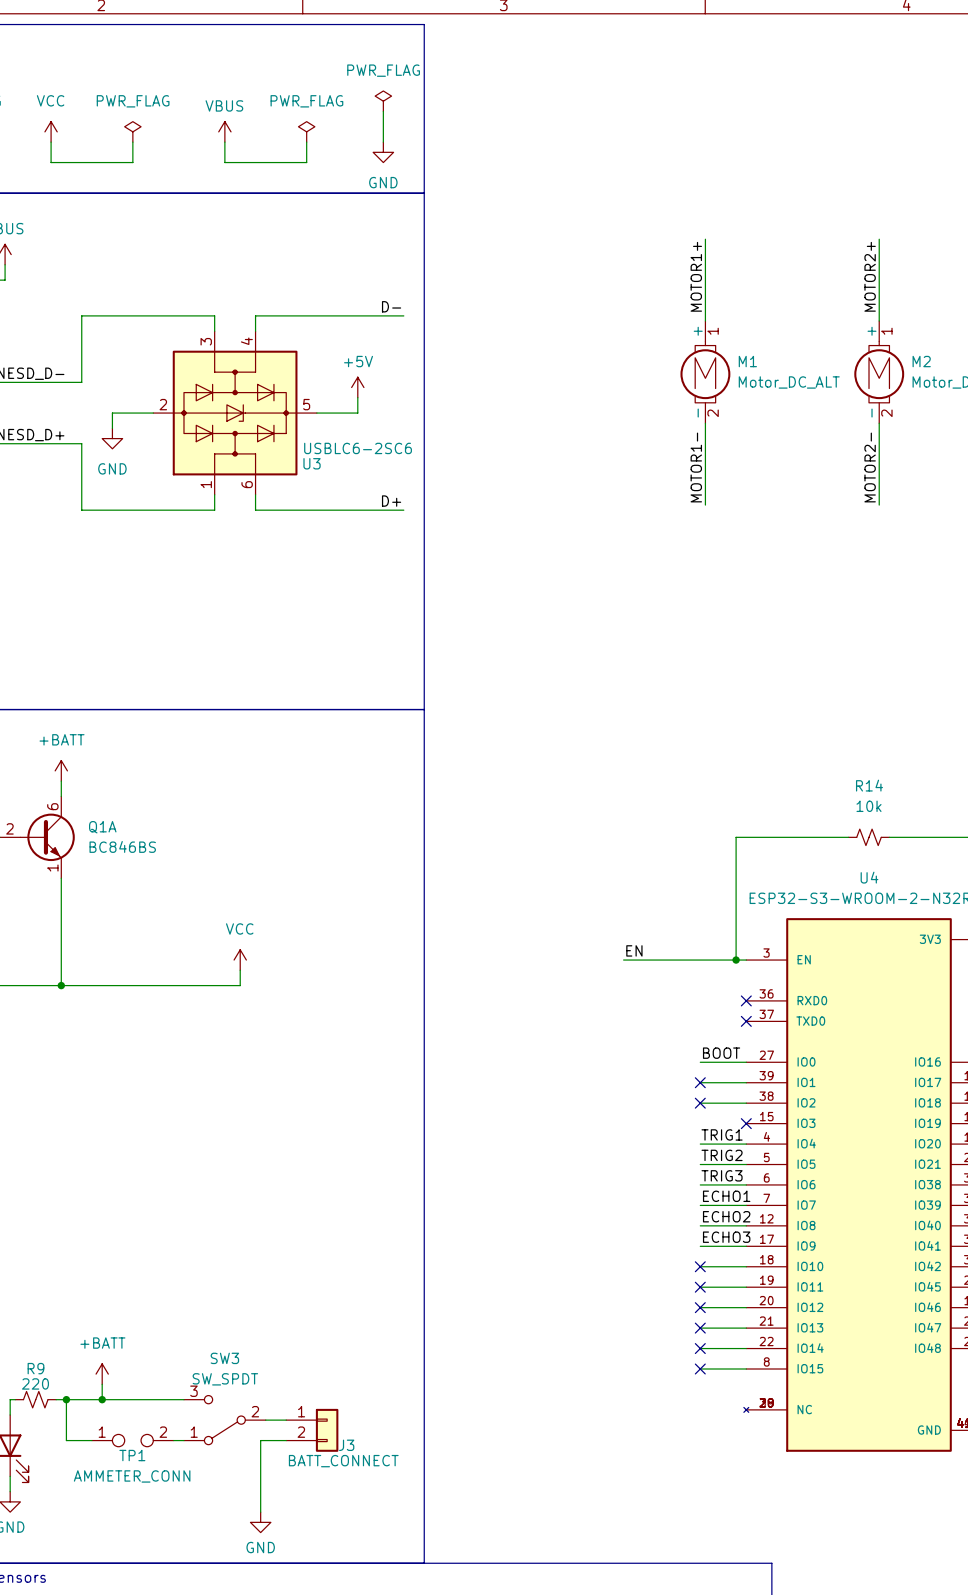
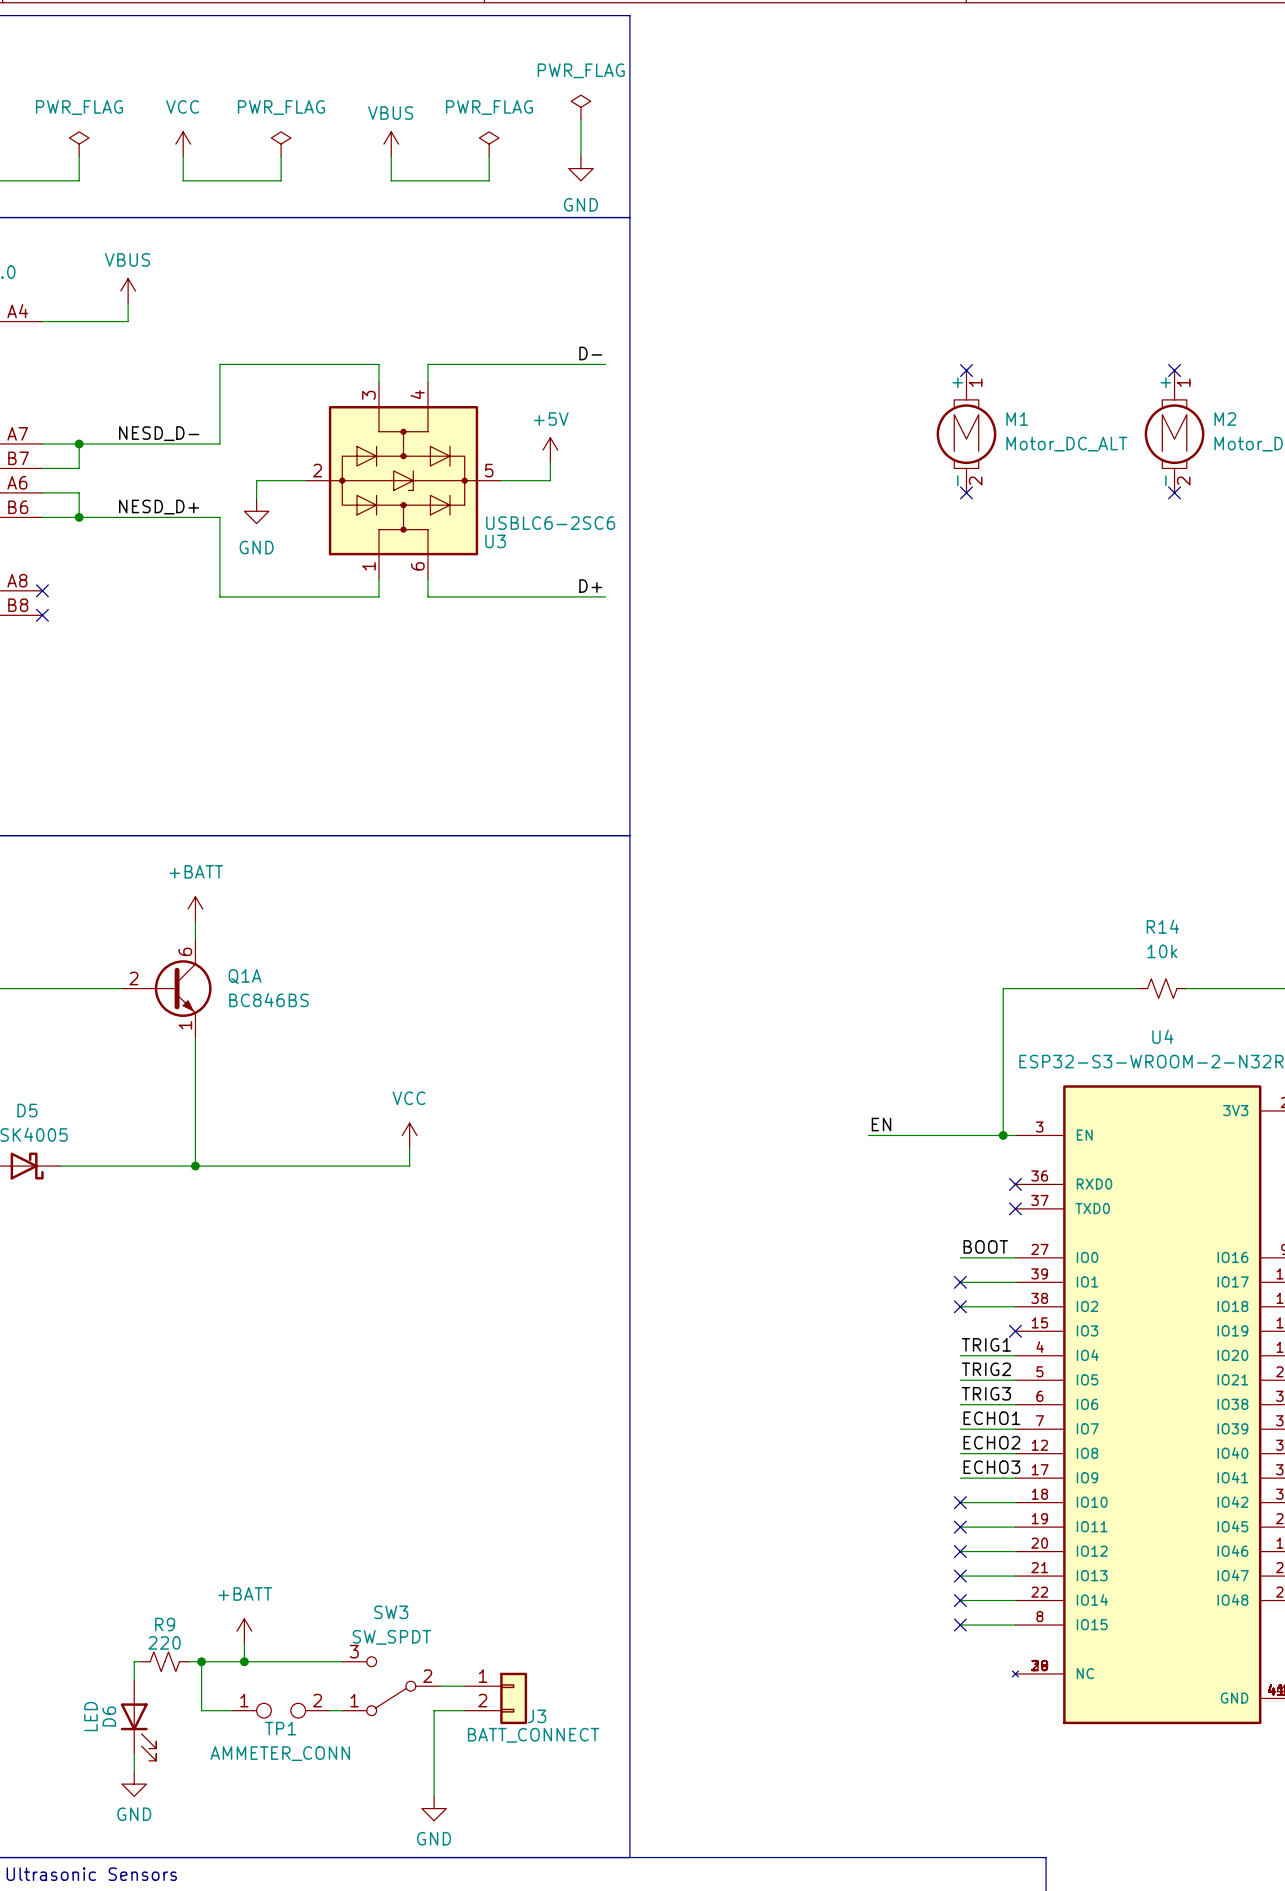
wire: (705, 239) (705, 321) -> none
wire: (879, 239) (879, 321) -> none
label: MOTOR1+ (696, 276) -> none
label: MOTOR2+ (870, 276) -> none
no-connect mark: none -> (966, 370)
no-connect mark: none -> (1174, 370)
wire: (705, 423) (705, 505) -> none
no-connect mark: none -> (966, 492)
wire: (879, 423) (879, 505) -> none
no-connect mark: none -> (1174, 492)
label: MOTOR1- (696, 467) -> none
label: MOTOR2- (870, 467) -> none

